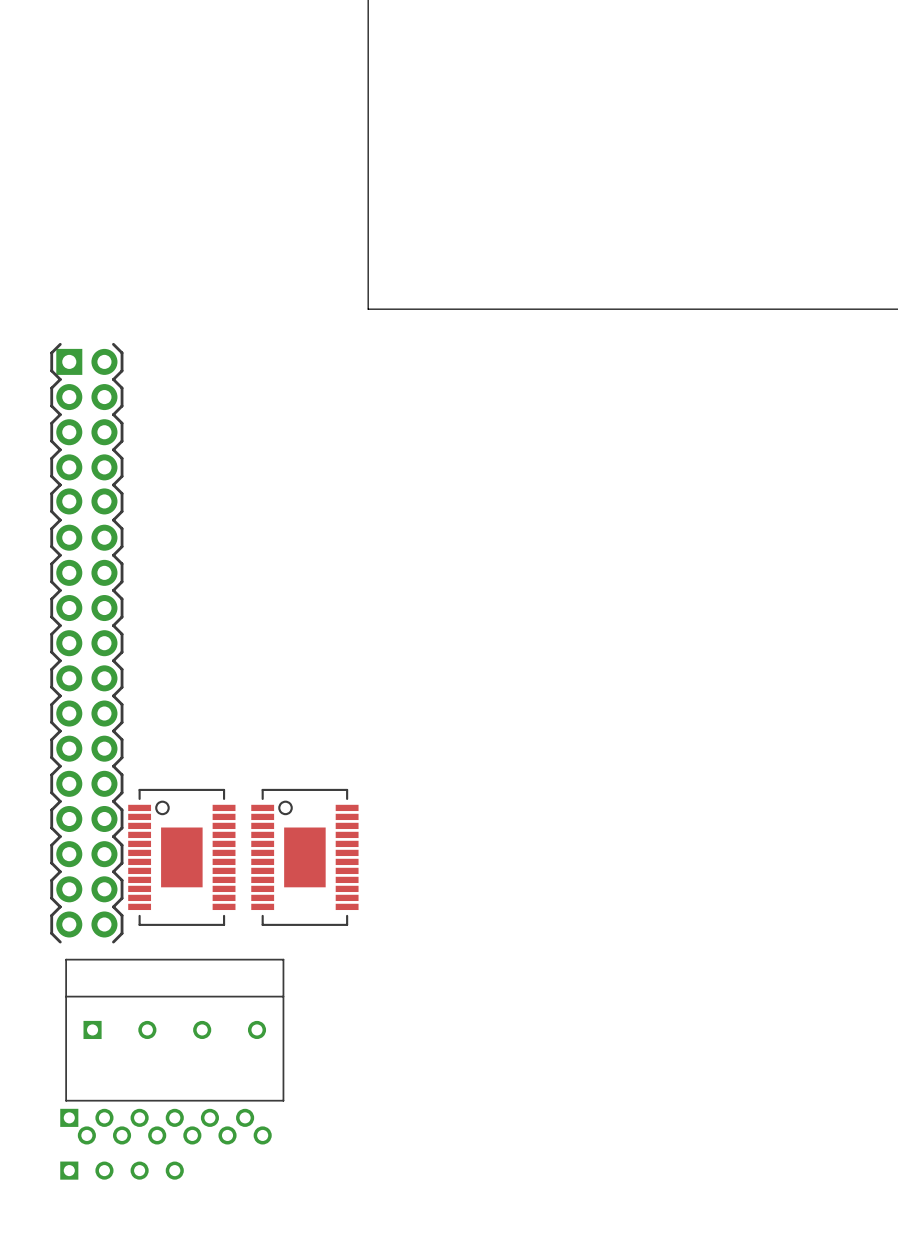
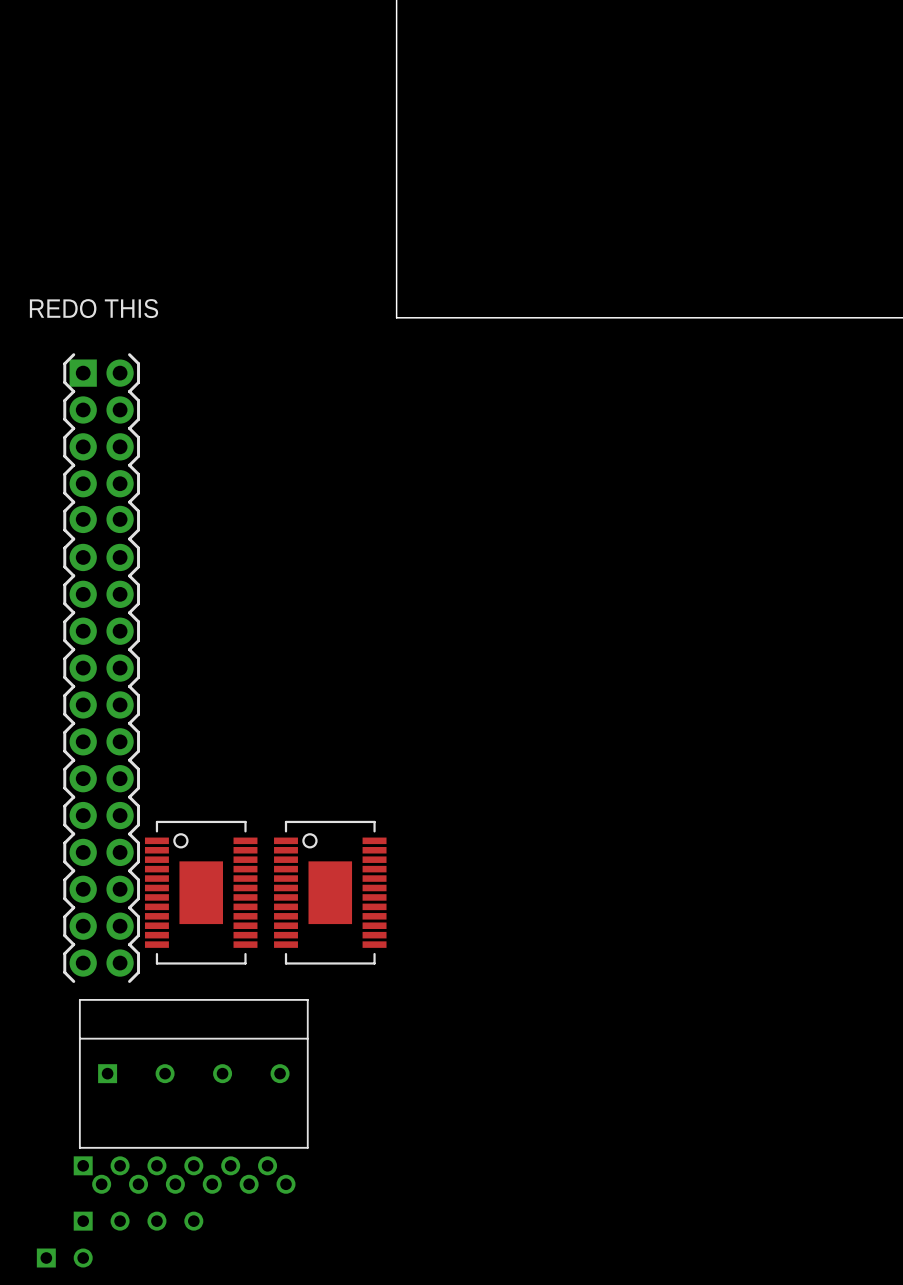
part text: none -> REDO THIS (93, 308)
part: none -> (64, 1258)

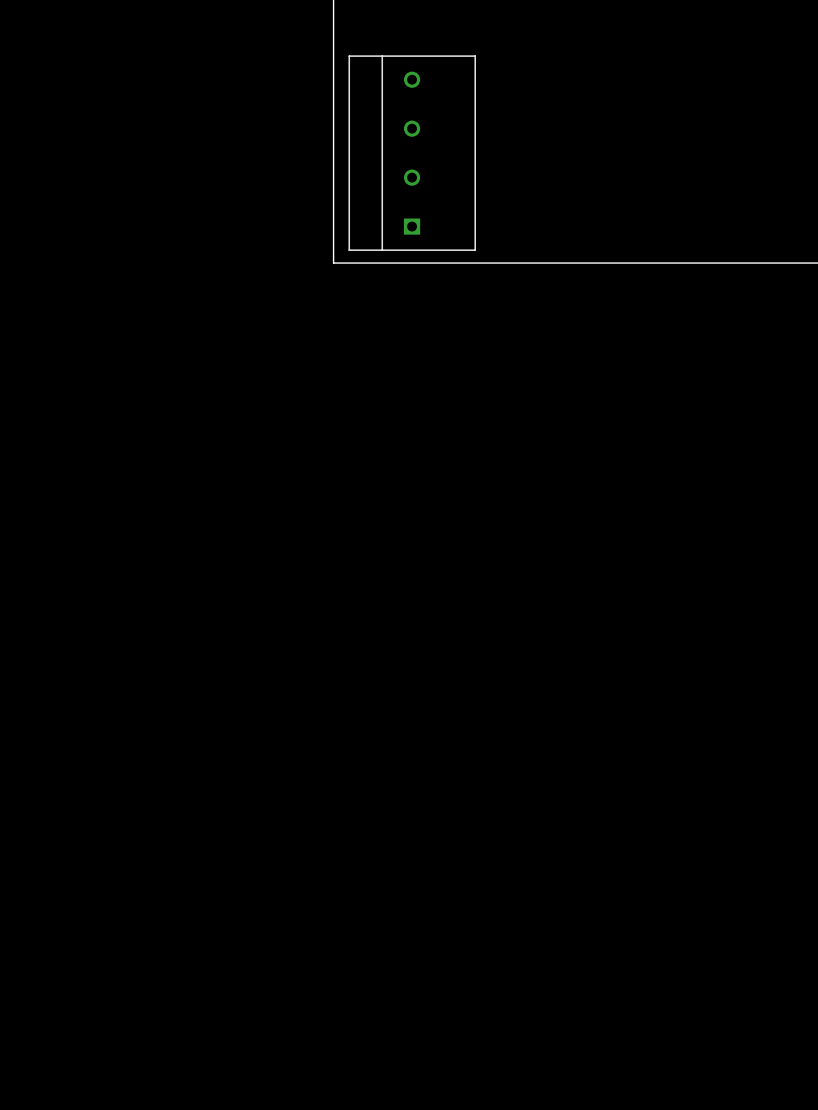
part: none -> (412, 153)
part: (101, 668) -> none
part: (201, 892) -> none
part: (330, 892) -> none
part: (193, 1073) -> none
part: (184, 1175) -> none
part: (138, 1221) -> none
part: (64, 1258) -> none

